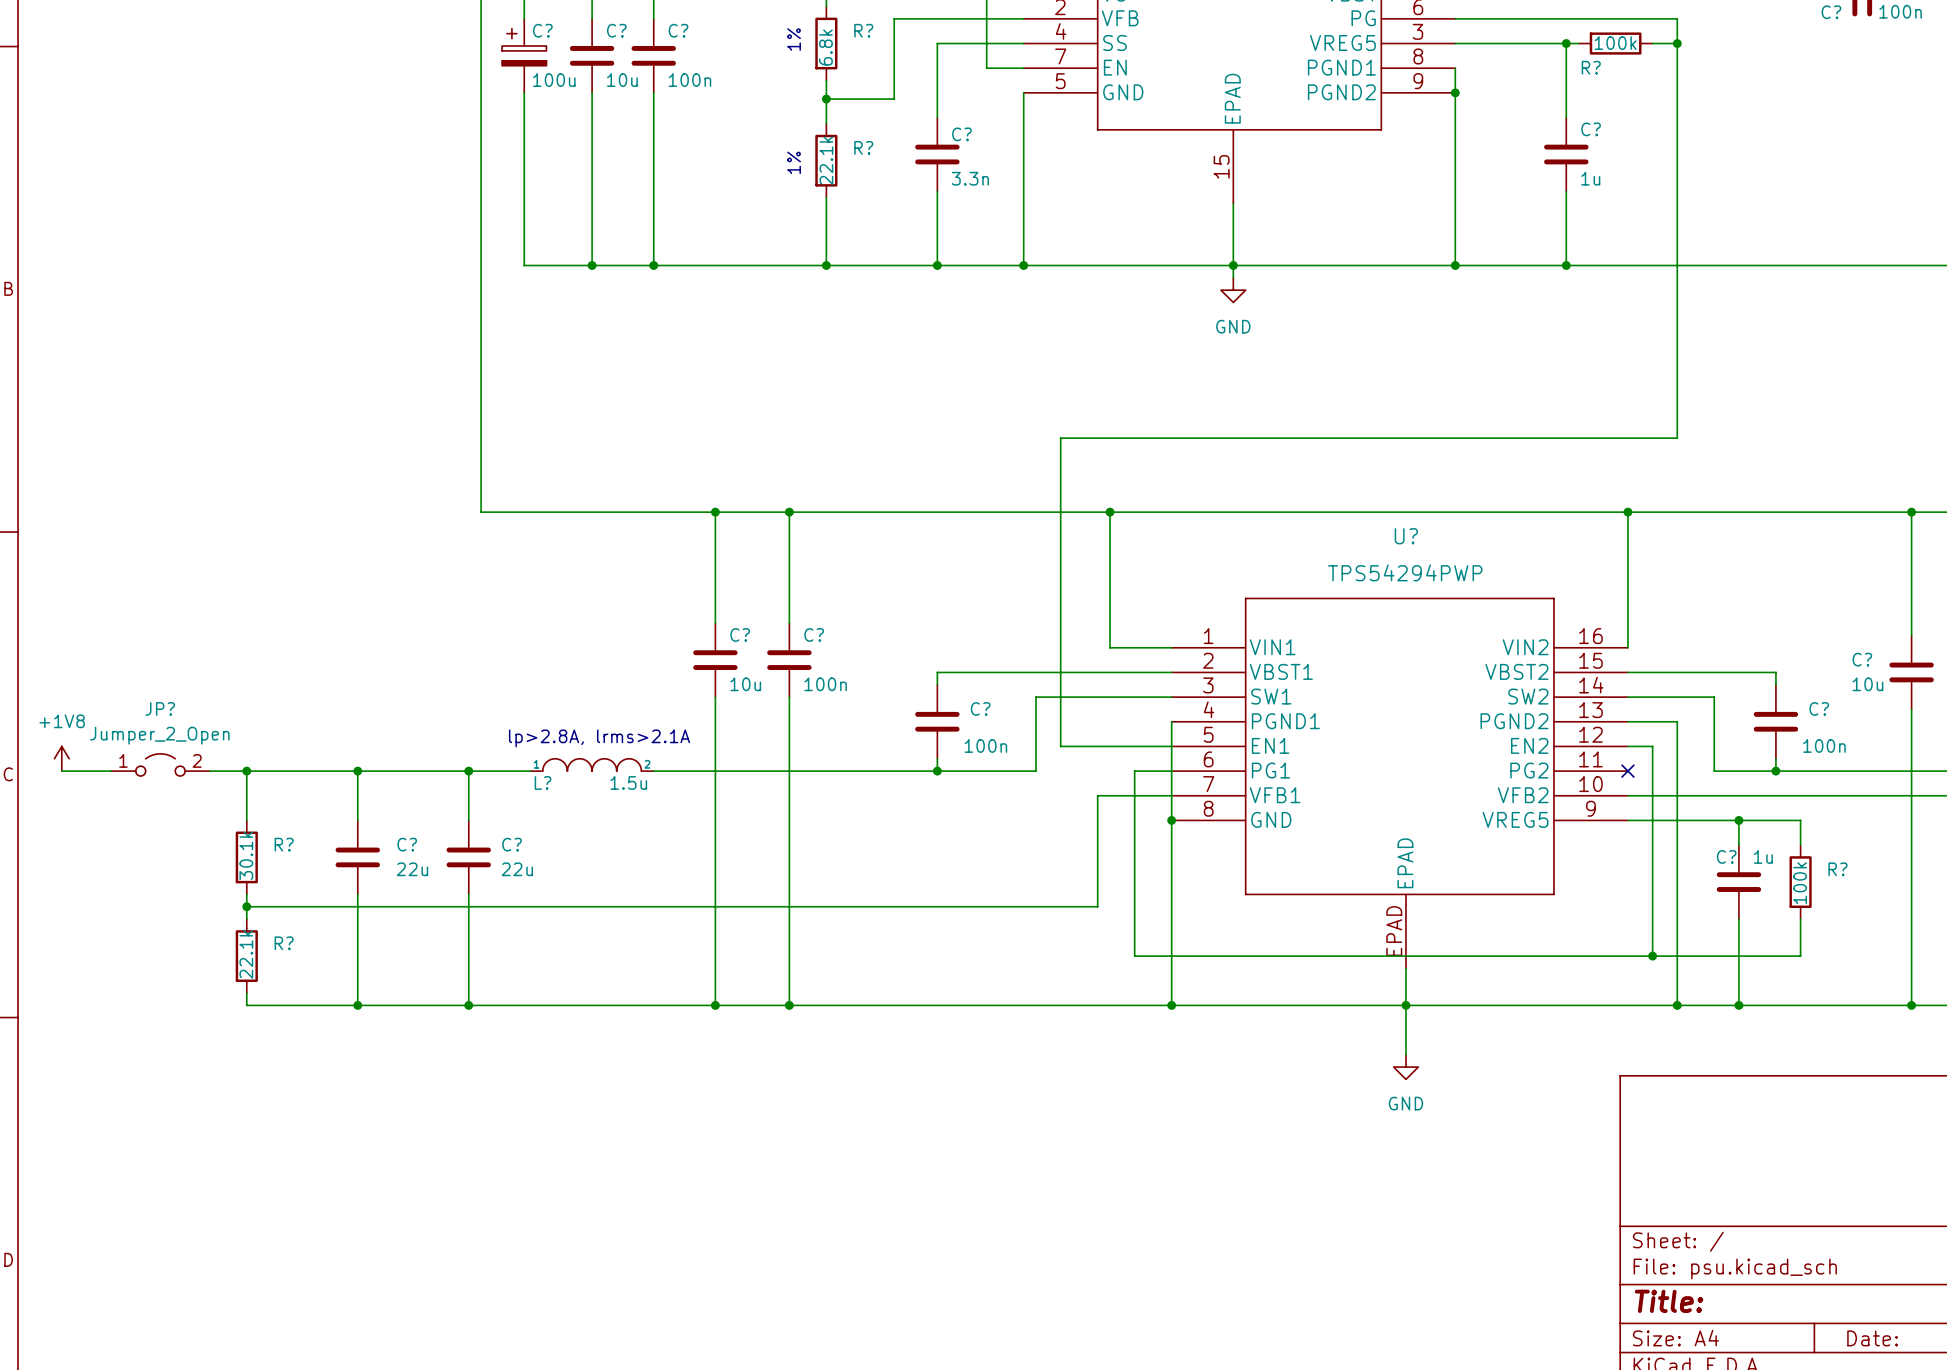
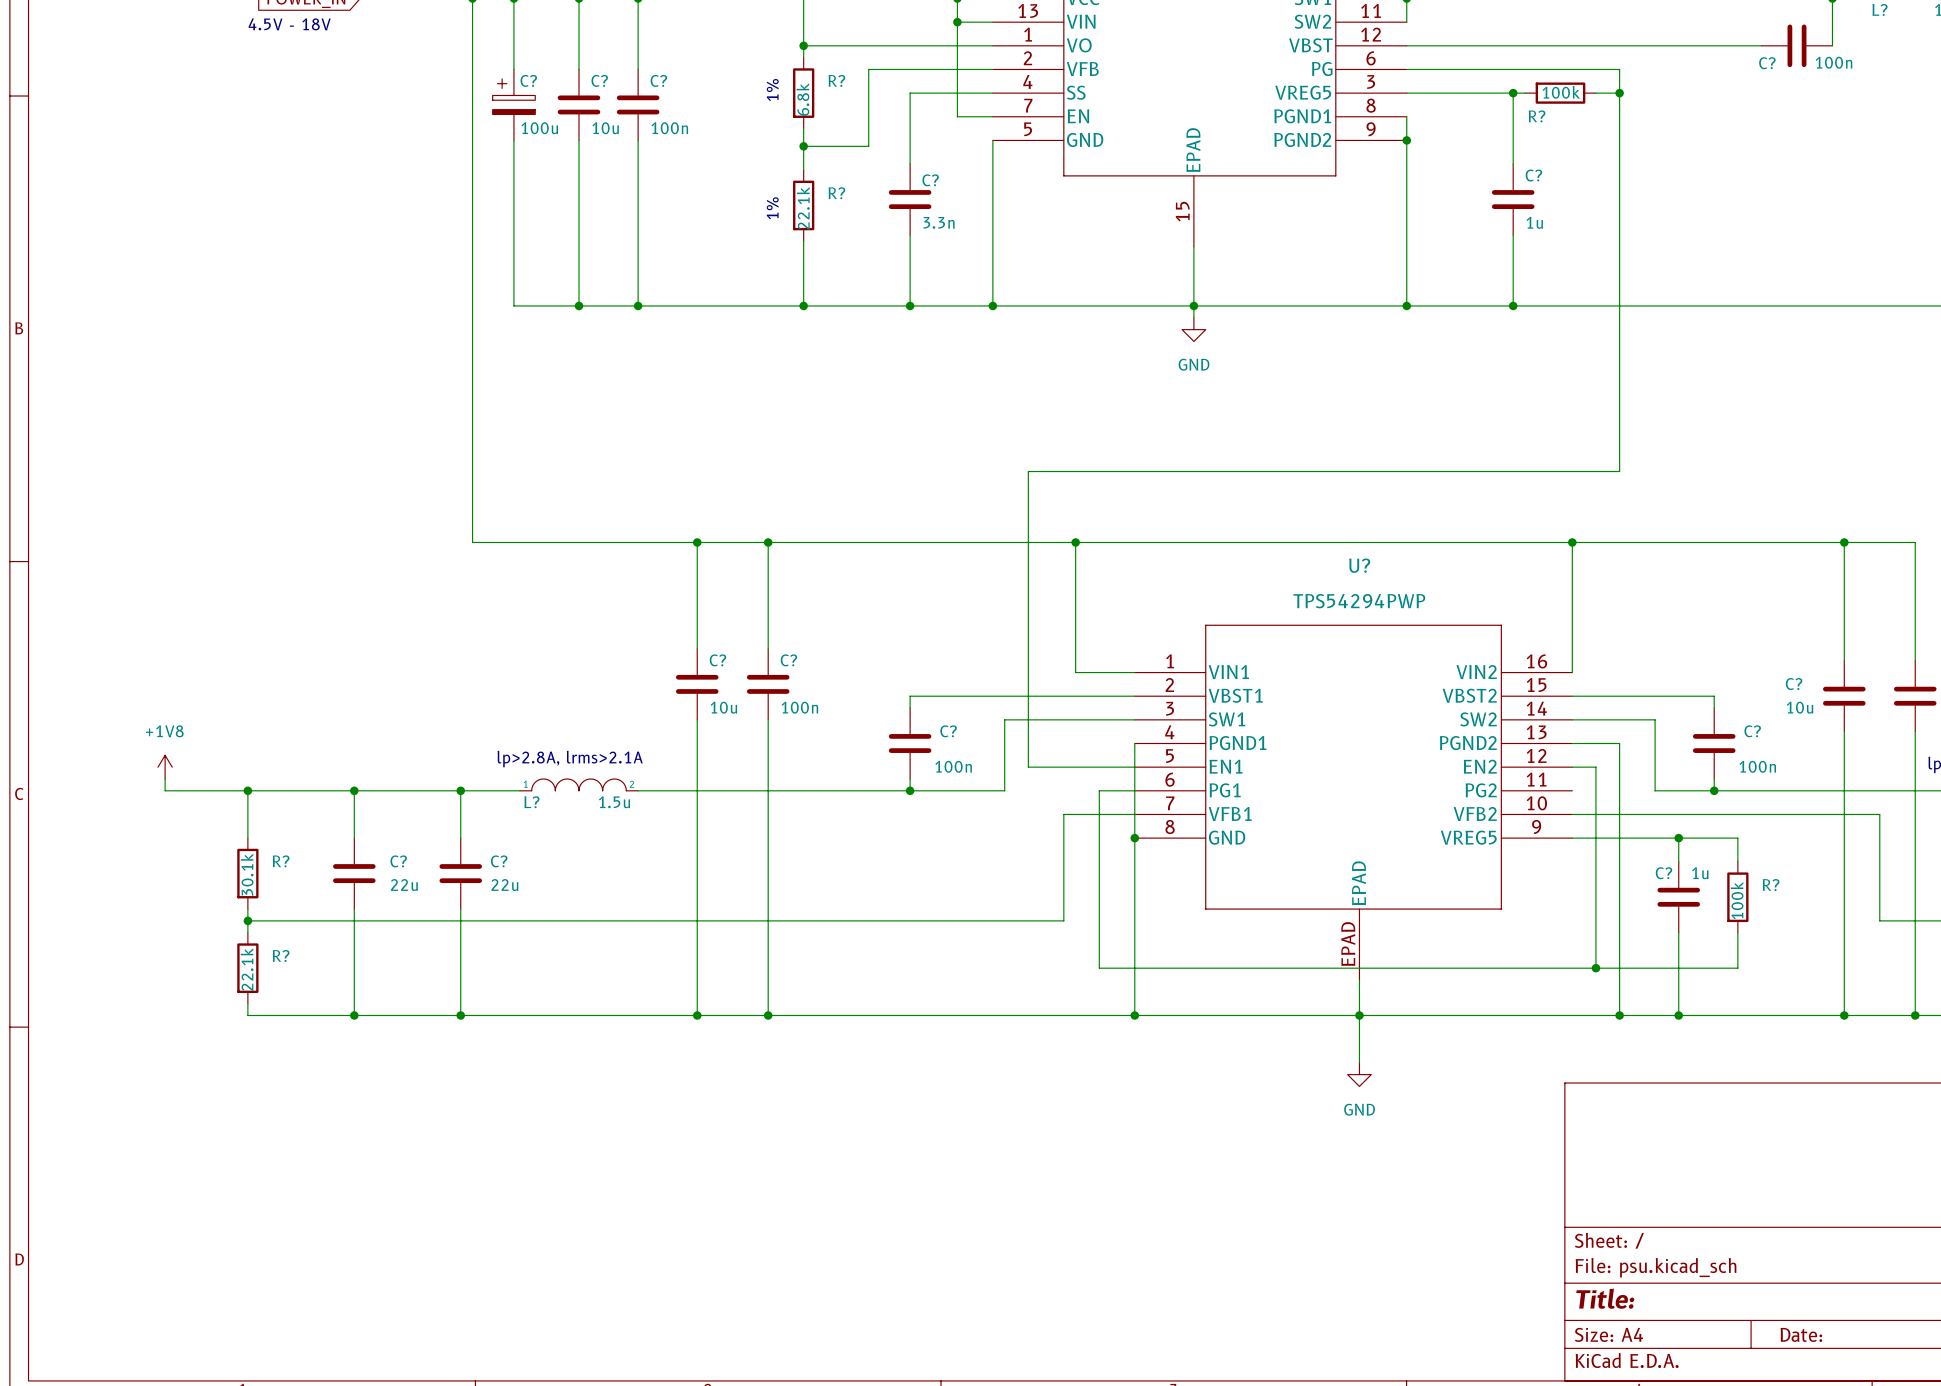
power symbol position: +1V8 (61, 758) -> +1V8 (165, 767)
wire: none -> (165, 778) (165, 790) (212, 790)
JP?: Jumper_2_Open (160, 764) -> none
wire: (61, 771) (111, 771) -> none
no-connect mark: (1627, 771) -> none

